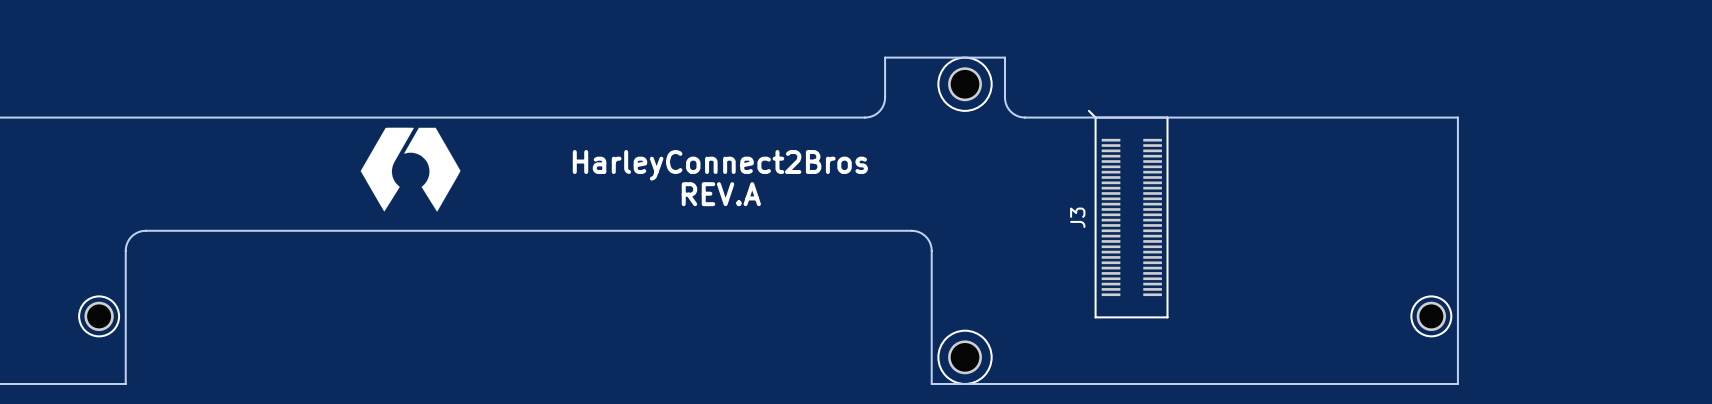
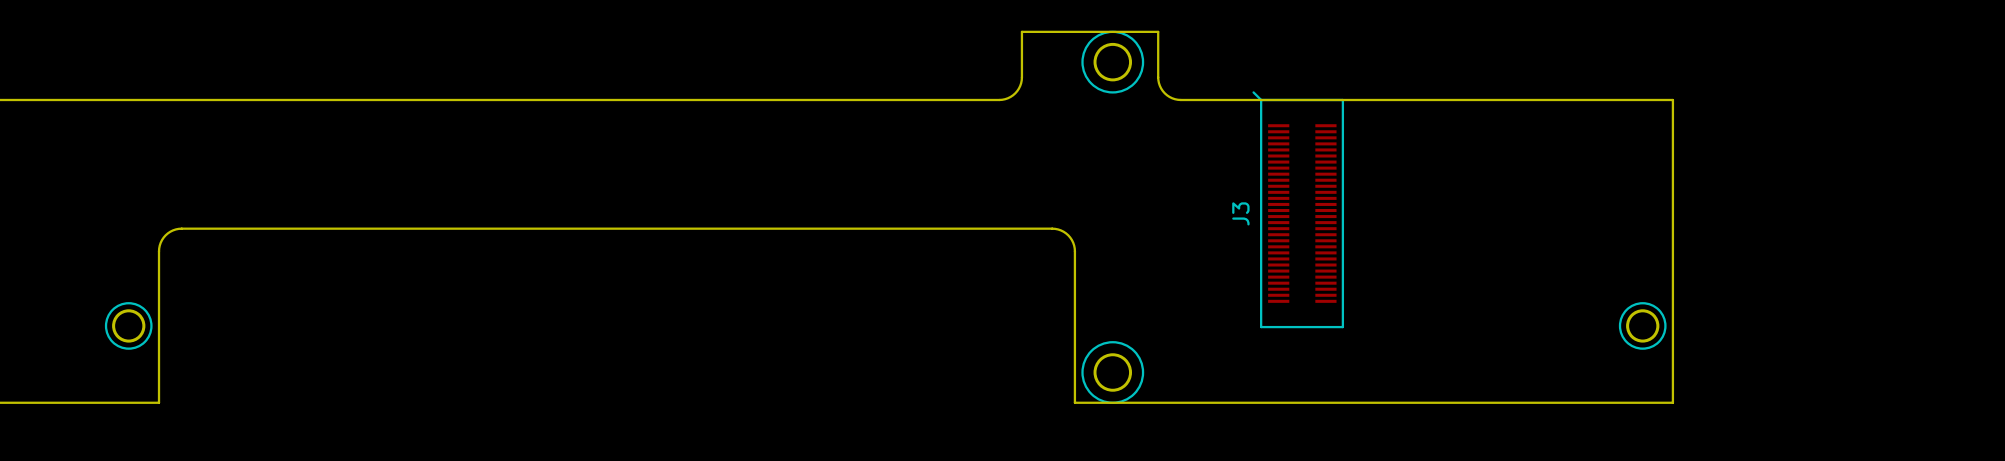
drawing: [360, 127, 461, 212] -> none
text: HarleyConnect2Bros (720, 165) -> none
text: REV.A (721, 194) -> none

